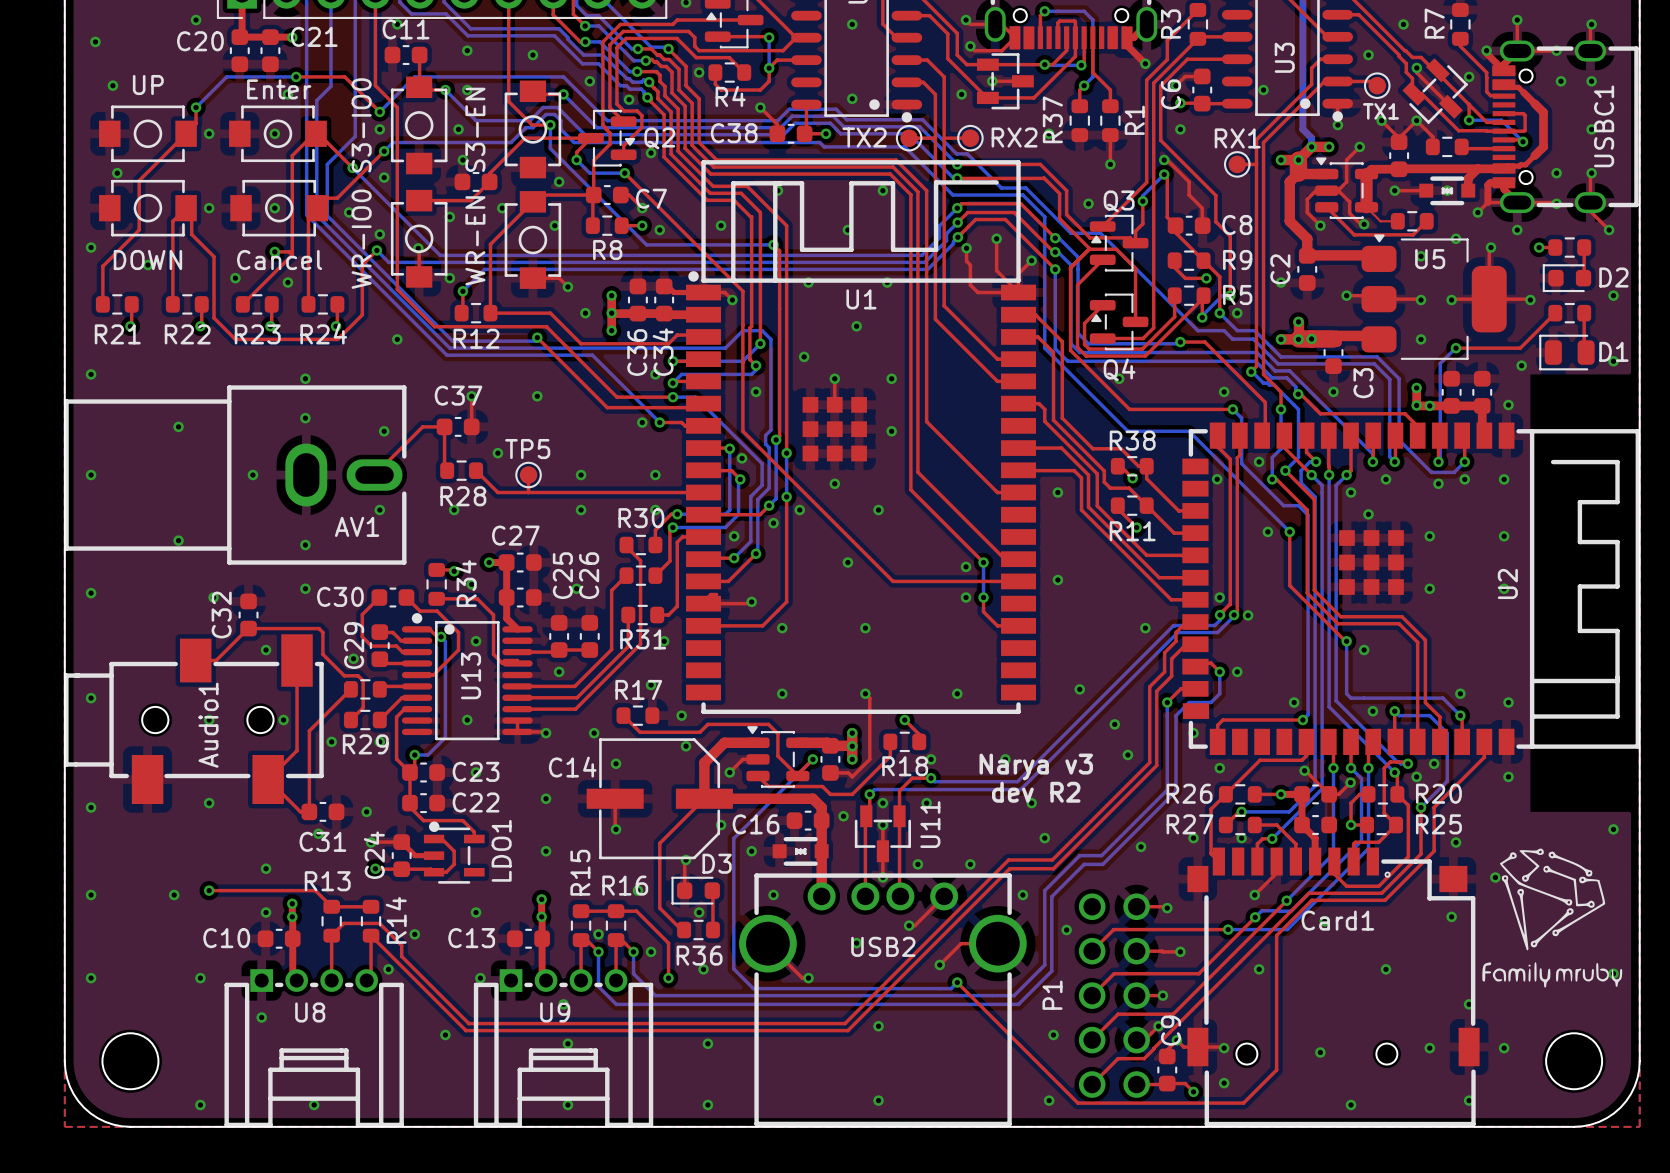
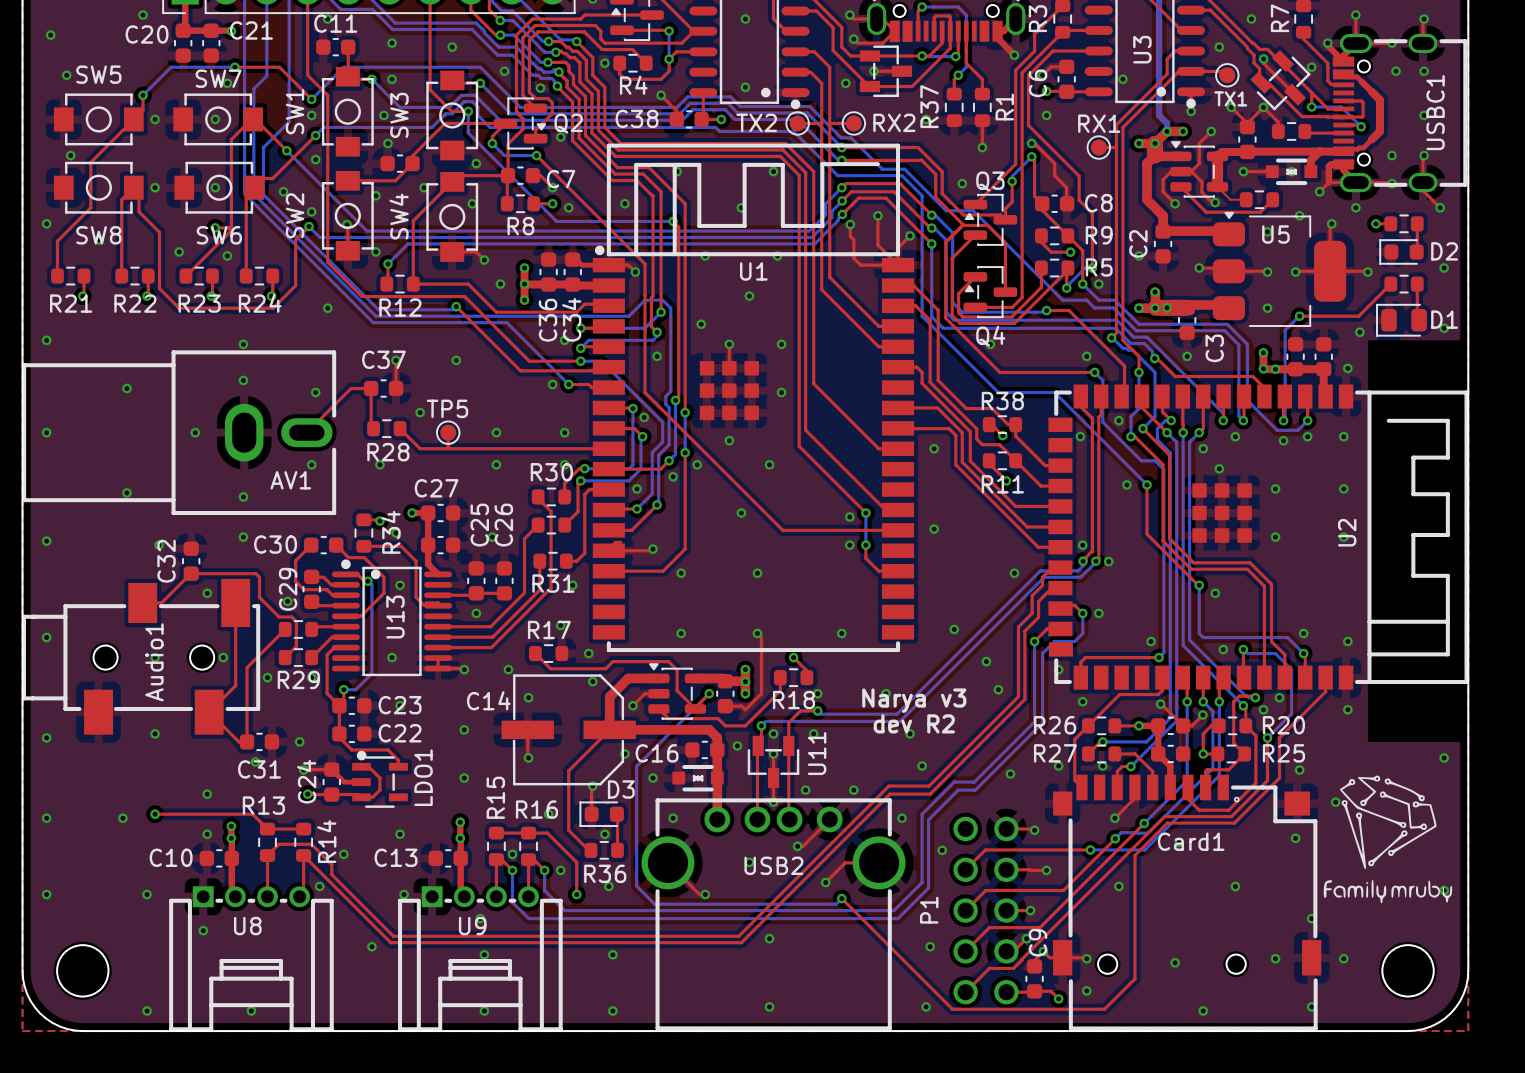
UP name: UP (148, 85) -> SW5 (98, 74)
Enter name: Enter (279, 89) -> SW7 (218, 78)
S3-IO0 name: S3-IO0 (361, 125) -> SW1 (295, 111)
S3-EN name: S3-EN (475, 129) -> SW3 (399, 115)
WR-IO0 name: WR-IO0 (361, 239) -> SW2 (295, 215)
WR-EN name: WR-EN (475, 240) -> SW4 (399, 216)
DOWN name: DOWN (147, 260) -> SW8 (98, 235)
Cancel name: Cancel (279, 260) -> SW6 (219, 235)

